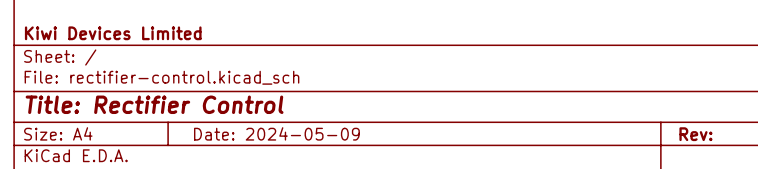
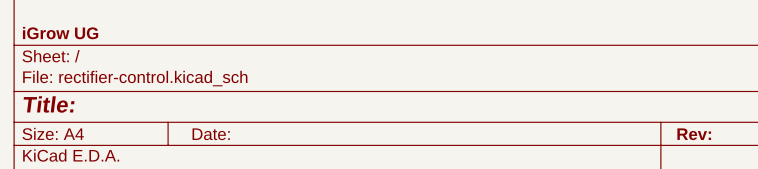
title block: Kiwi Devices Limited (113, 33) -> iGrow UG (60, 33)
title block: Title: Rectifier Control (154, 104) -> Title: (49, 104)
title block: Date: 2024-05-09 (276, 133) -> Date: (211, 134)

